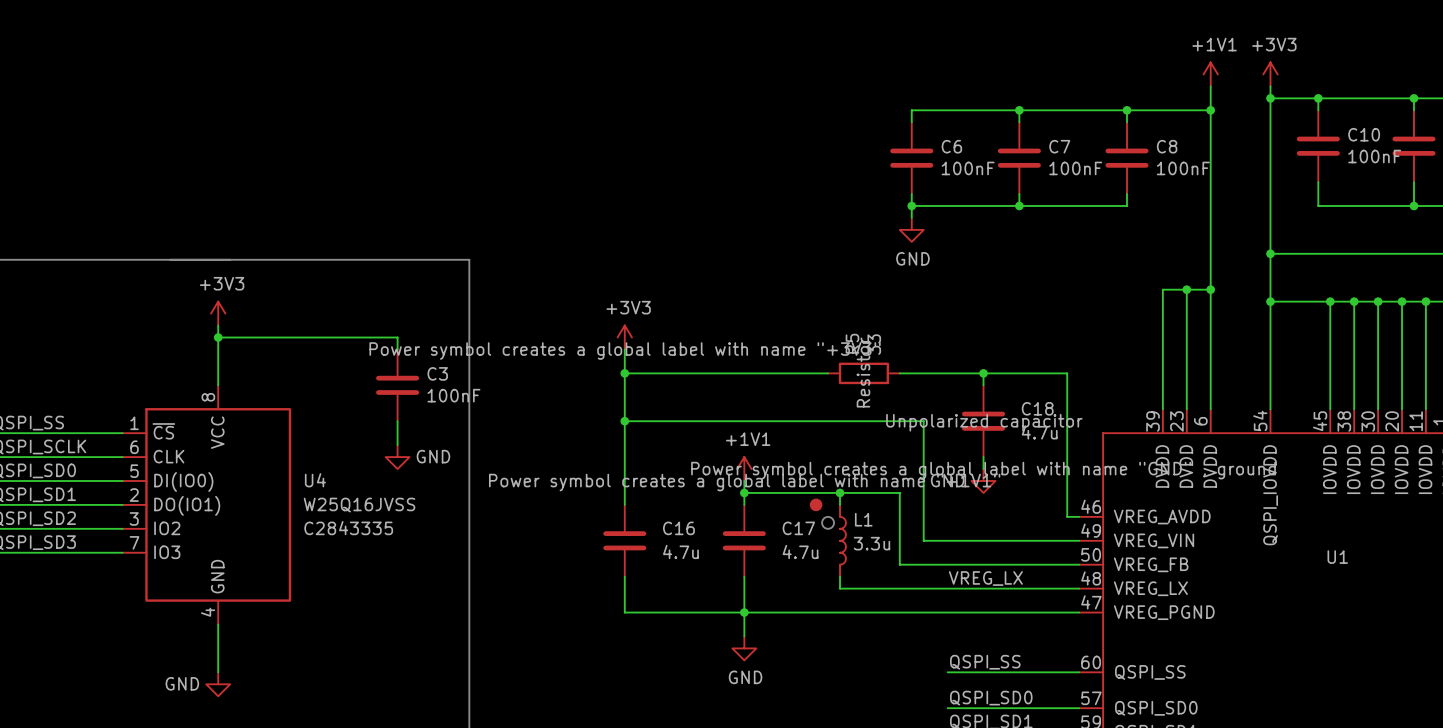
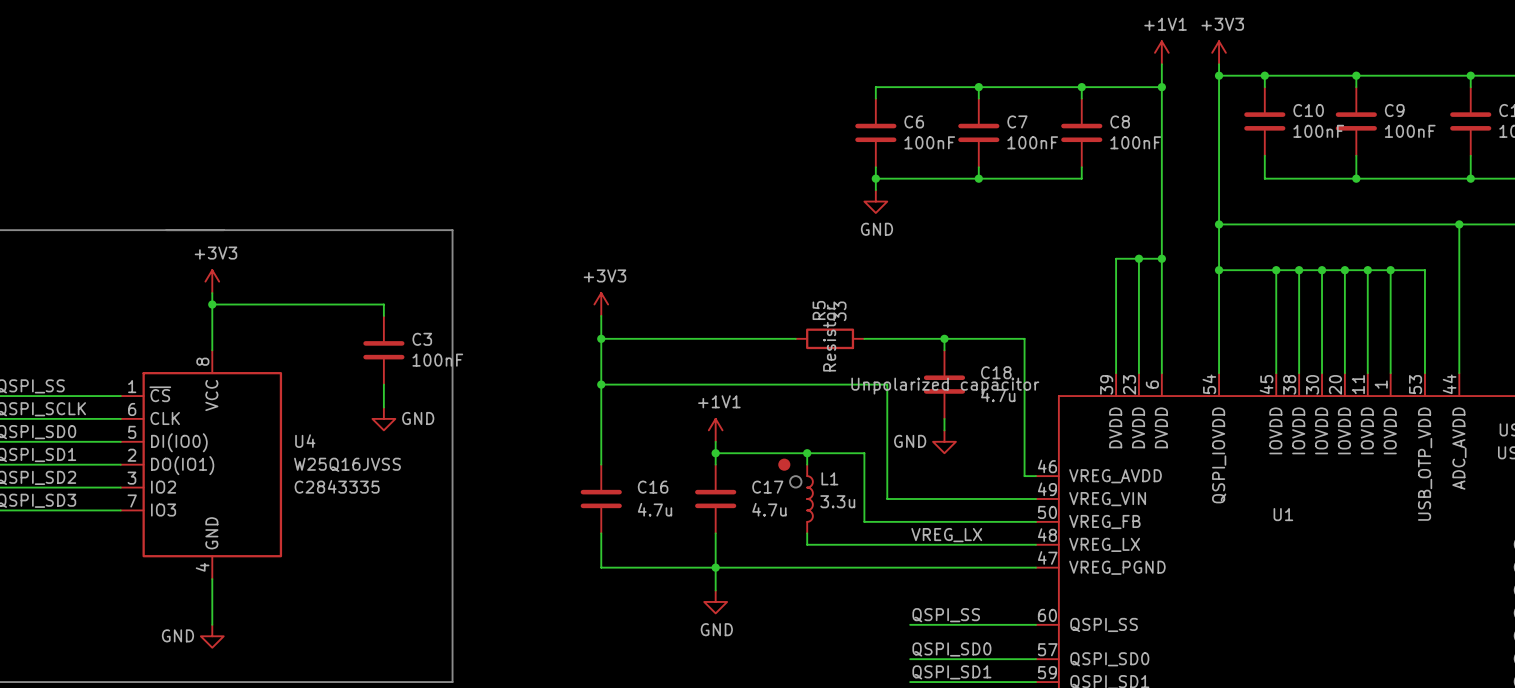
power symbol text: Power symbol creates a global label with name "+3V3" (625, 351) -> none
power symbol text: Power symbol creates a global label with name "GND" , ground (983, 470) -> none
power symbol text: Power symbol creates a global label with name "+1V1" (744, 482) -> none

